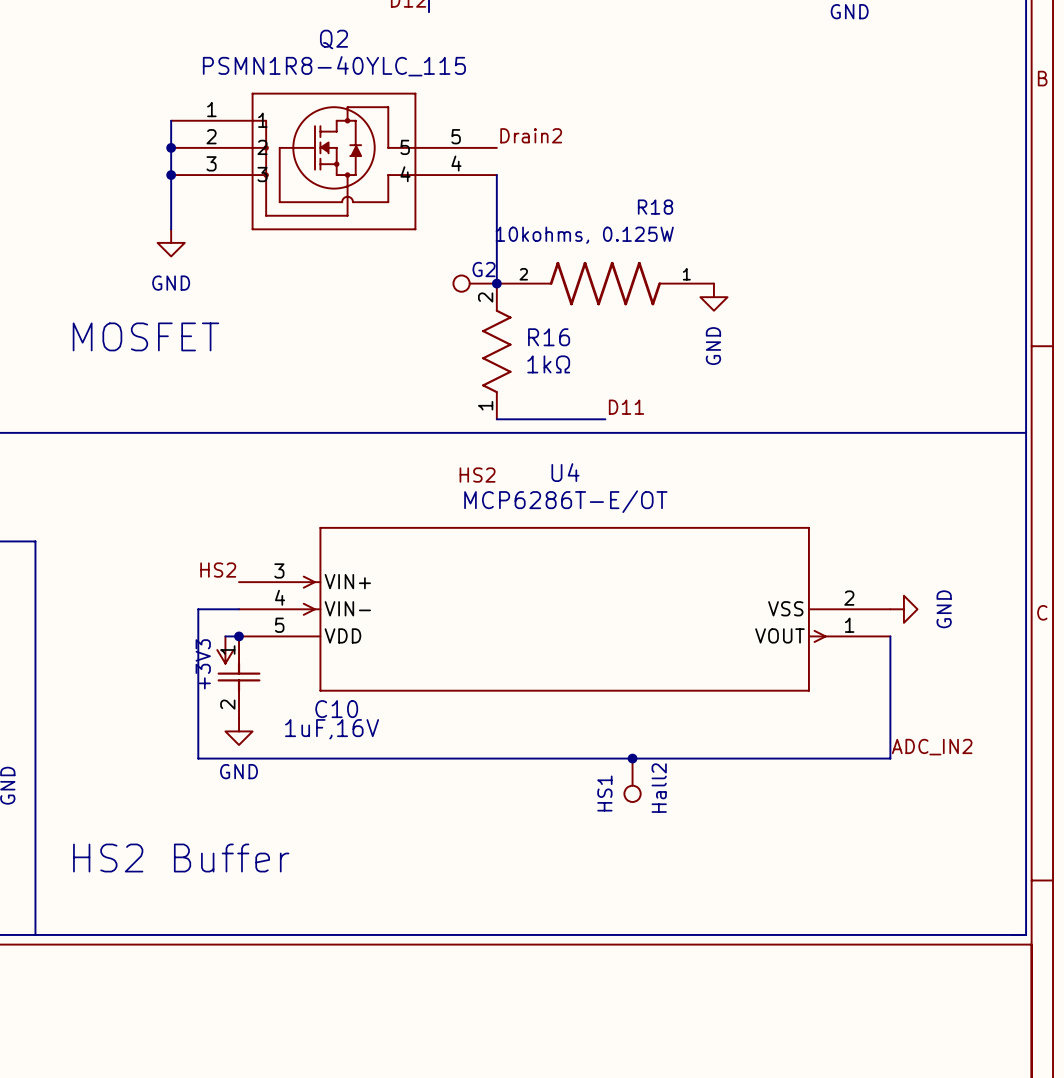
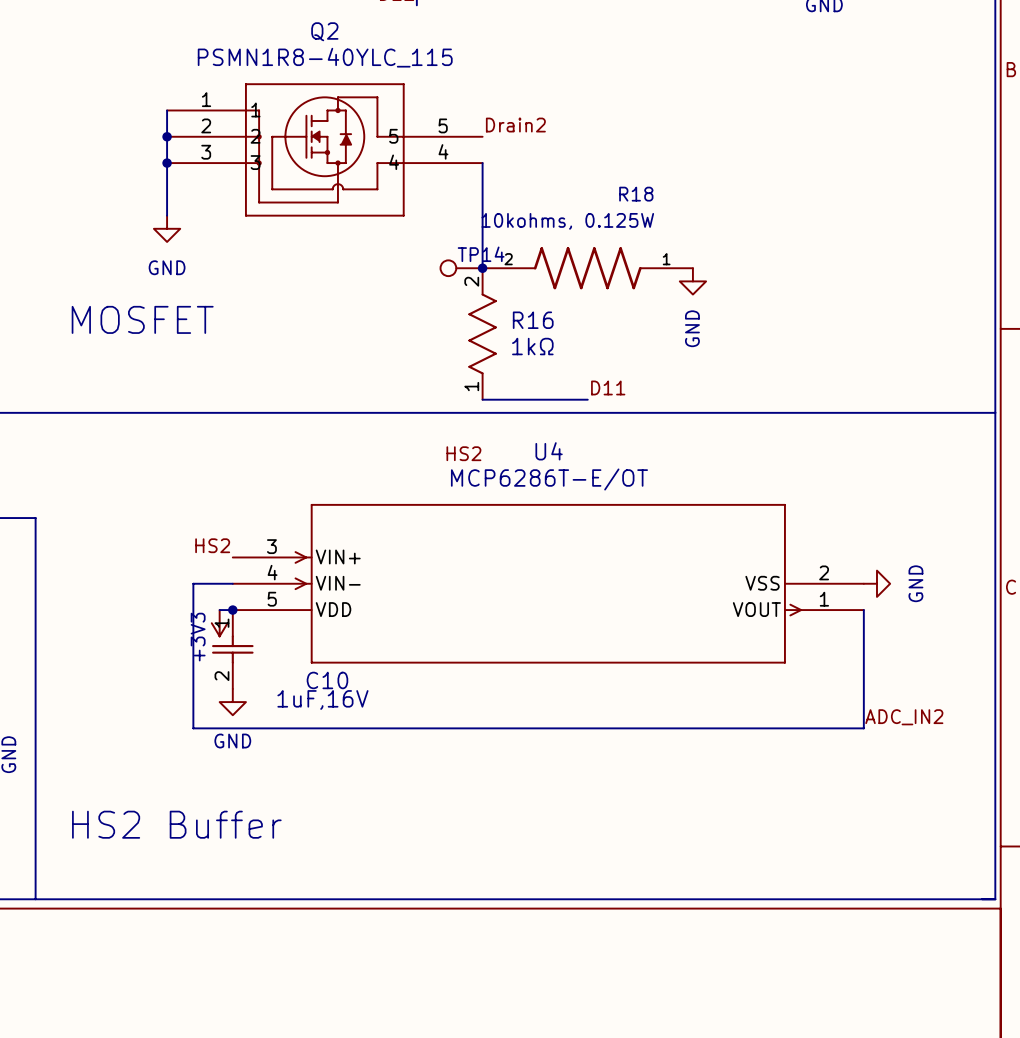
G2 name: G2 (484, 269) -> TP14 (481, 254)
junction: (632, 758) -> none
Hall2: HS1 (632, 780) -> none

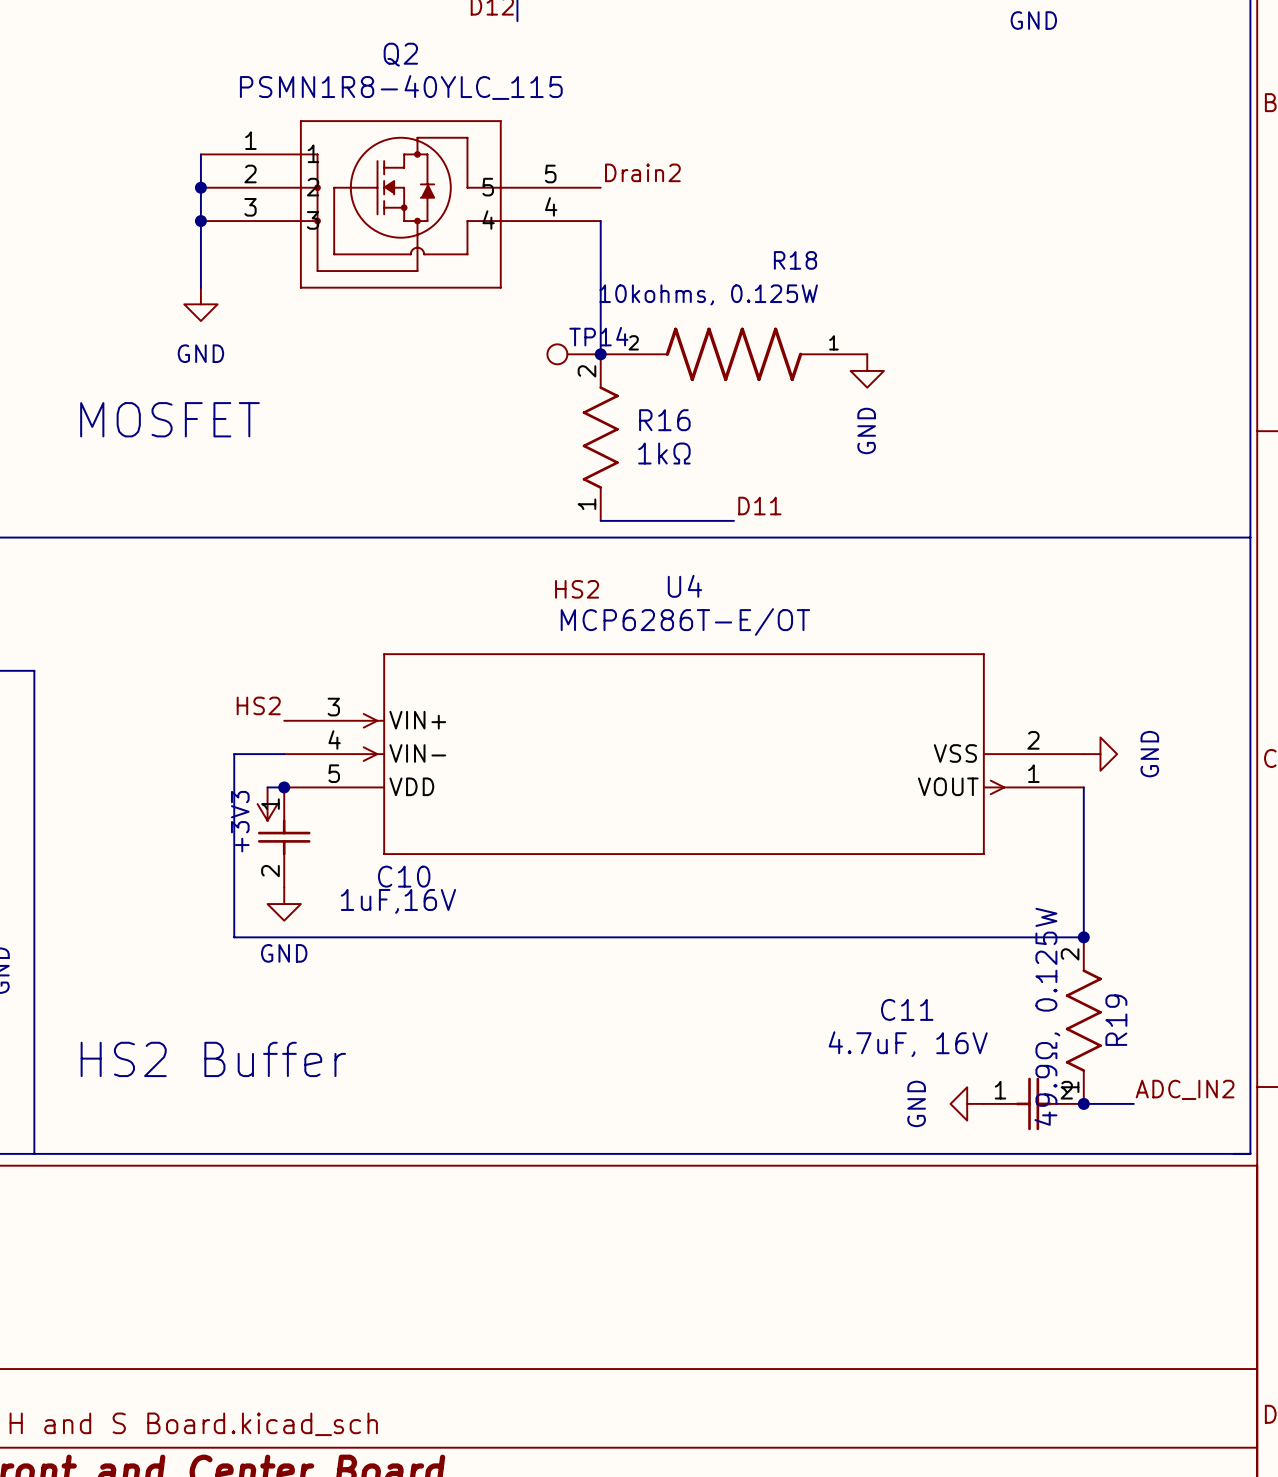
label position: ADC_IN2 (904, 717) -> ADC_IN2 (1185, 1089)
junction: none -> (1083, 937)
R19: none -> 49.9Ω, 0.125W (1083, 1020)
power symbol: none -> GND (967, 1103)
C11: none -> 4.7uF, 16V (1033, 1103)
wire: none -> (1083, 1103) (1133, 1103)
junction: none -> (1083, 1103)

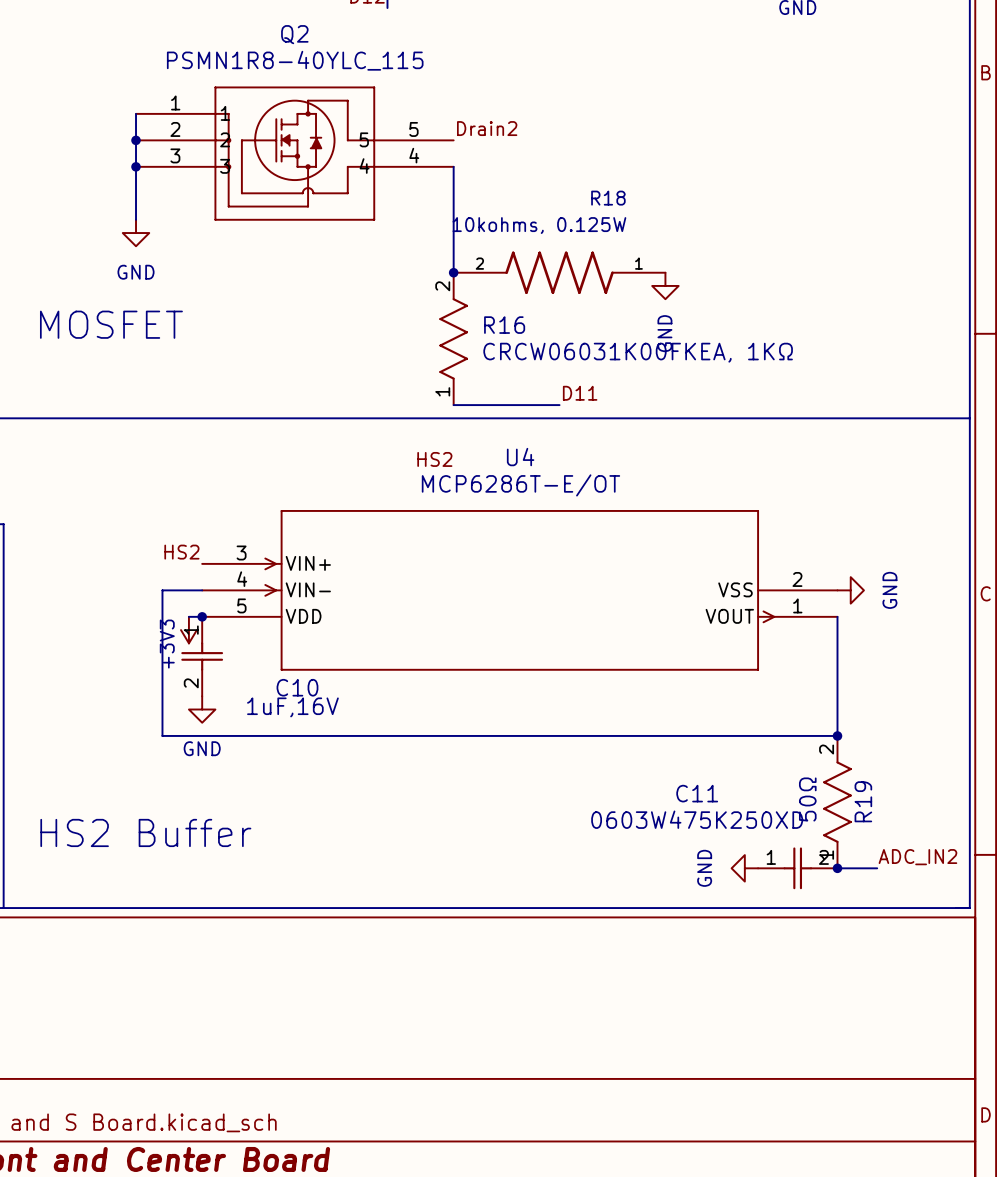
TP14: (574, 354) -> none
R16 value: 1kΩ (664, 453) -> CRCW06031K00FKEA, 1KΩ (638, 352)
R19 value: 49.9Ω, 0.125W (1047, 1016) -> 50Ω (807, 799)
C11 value: 4.7uF, 16V (908, 1044) -> 0603W475K250XD (697, 819)

